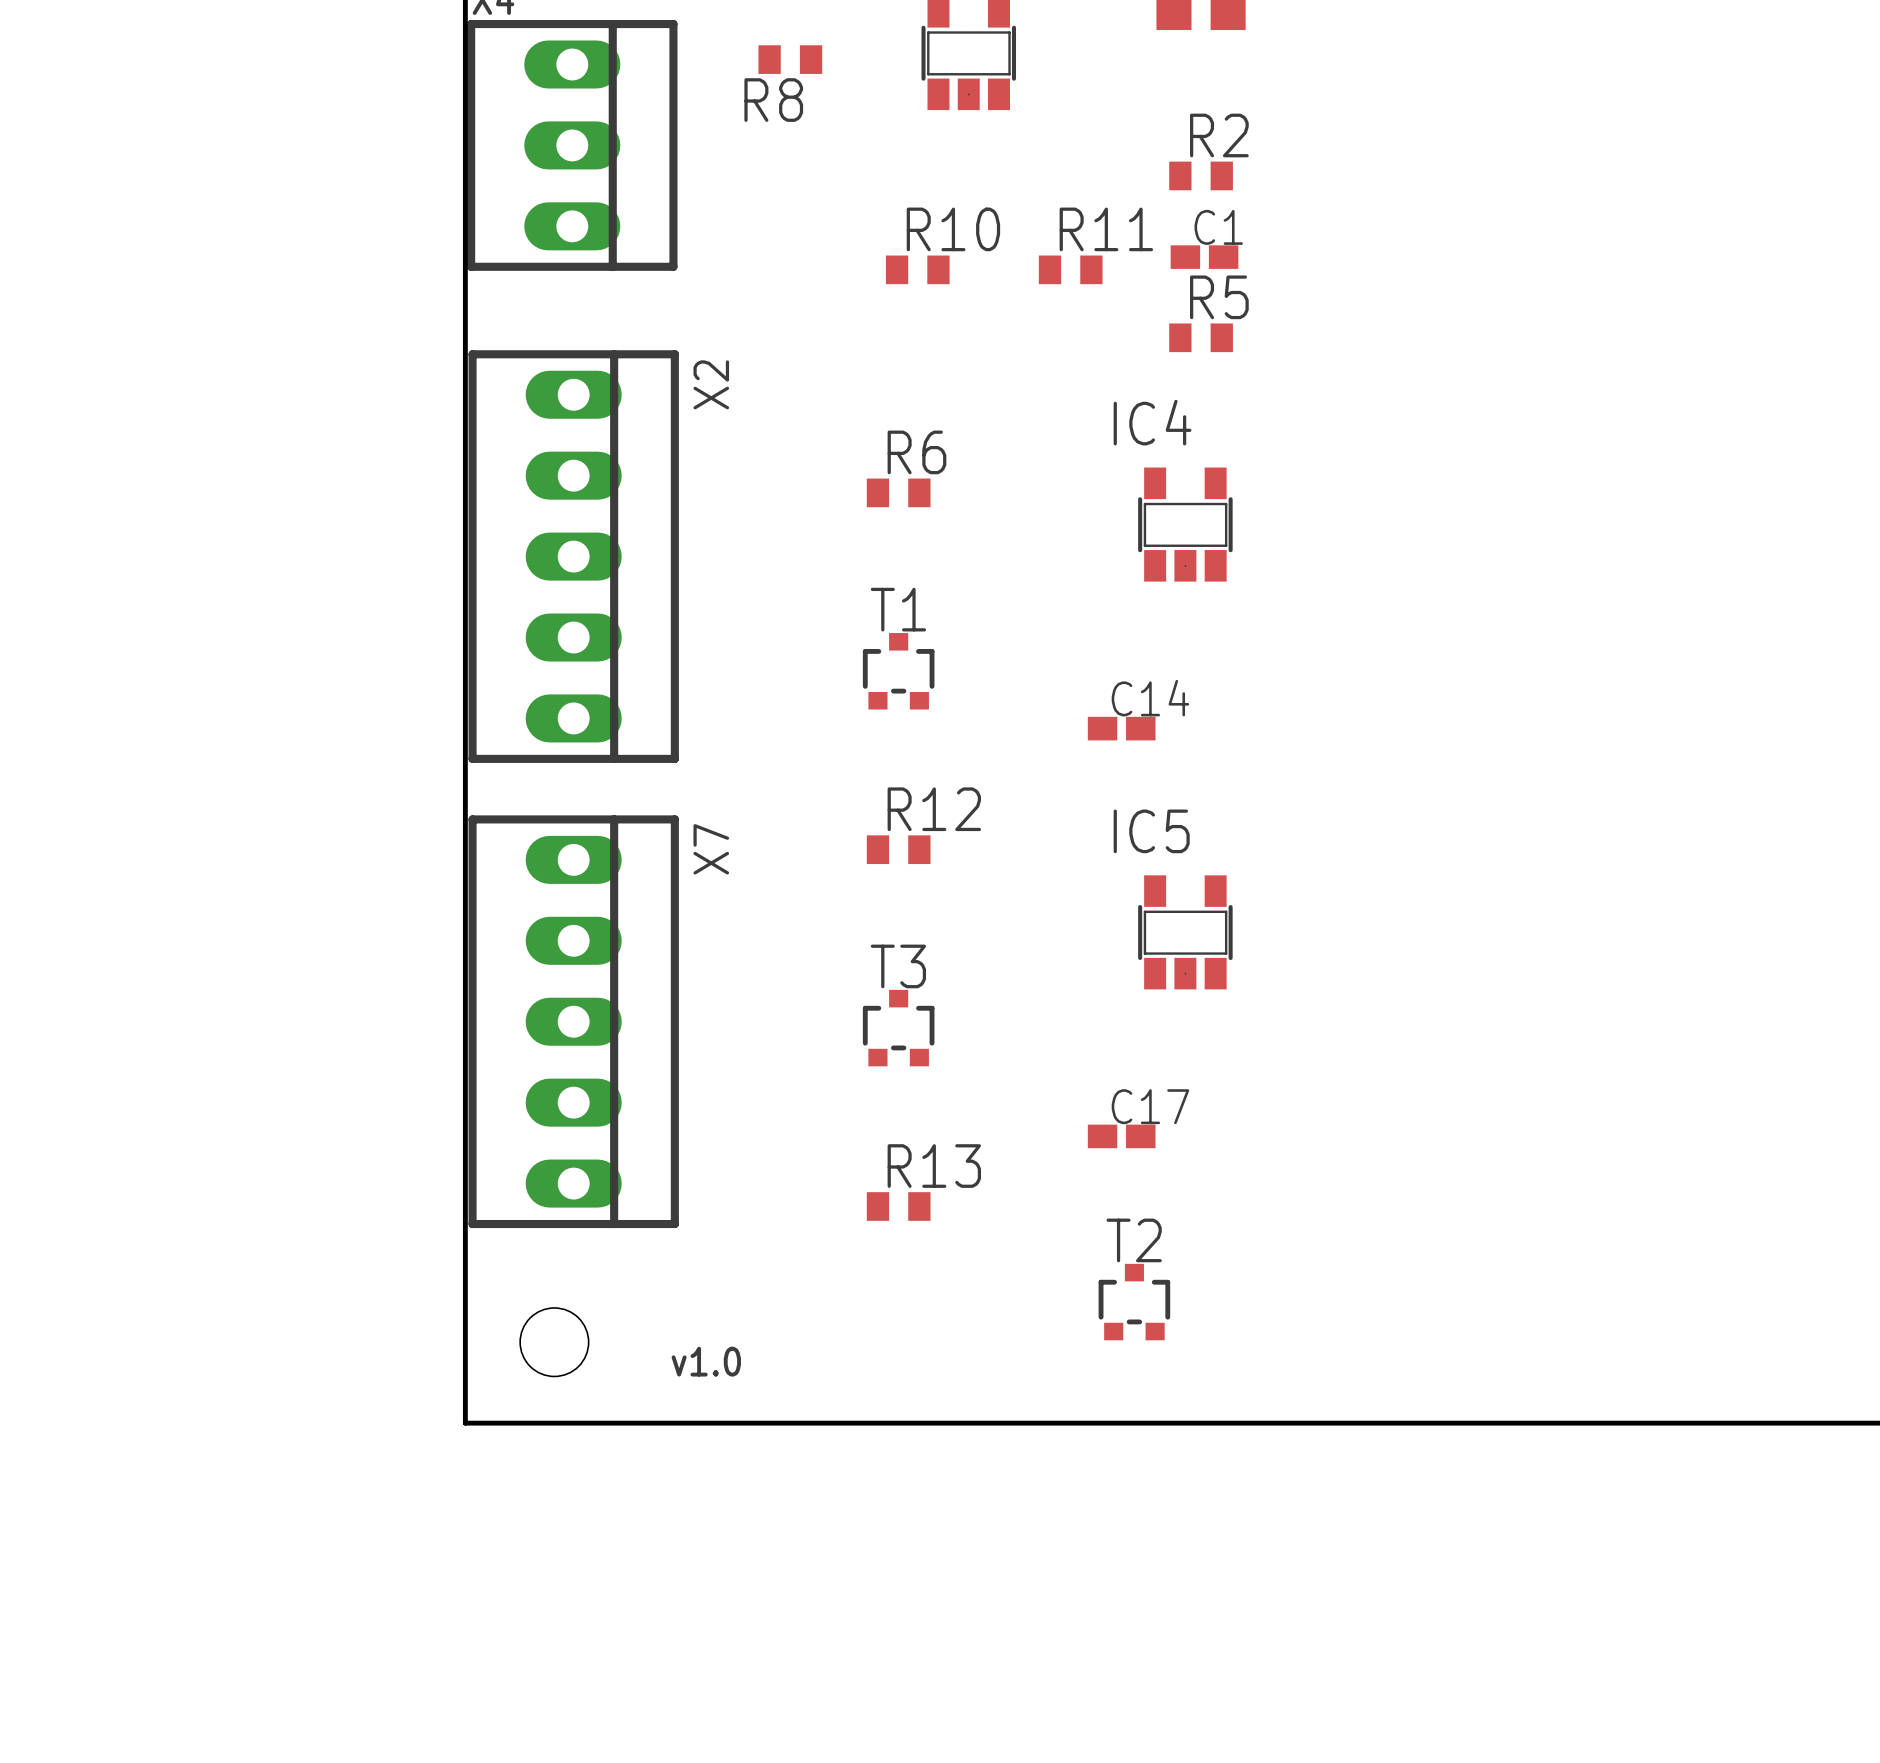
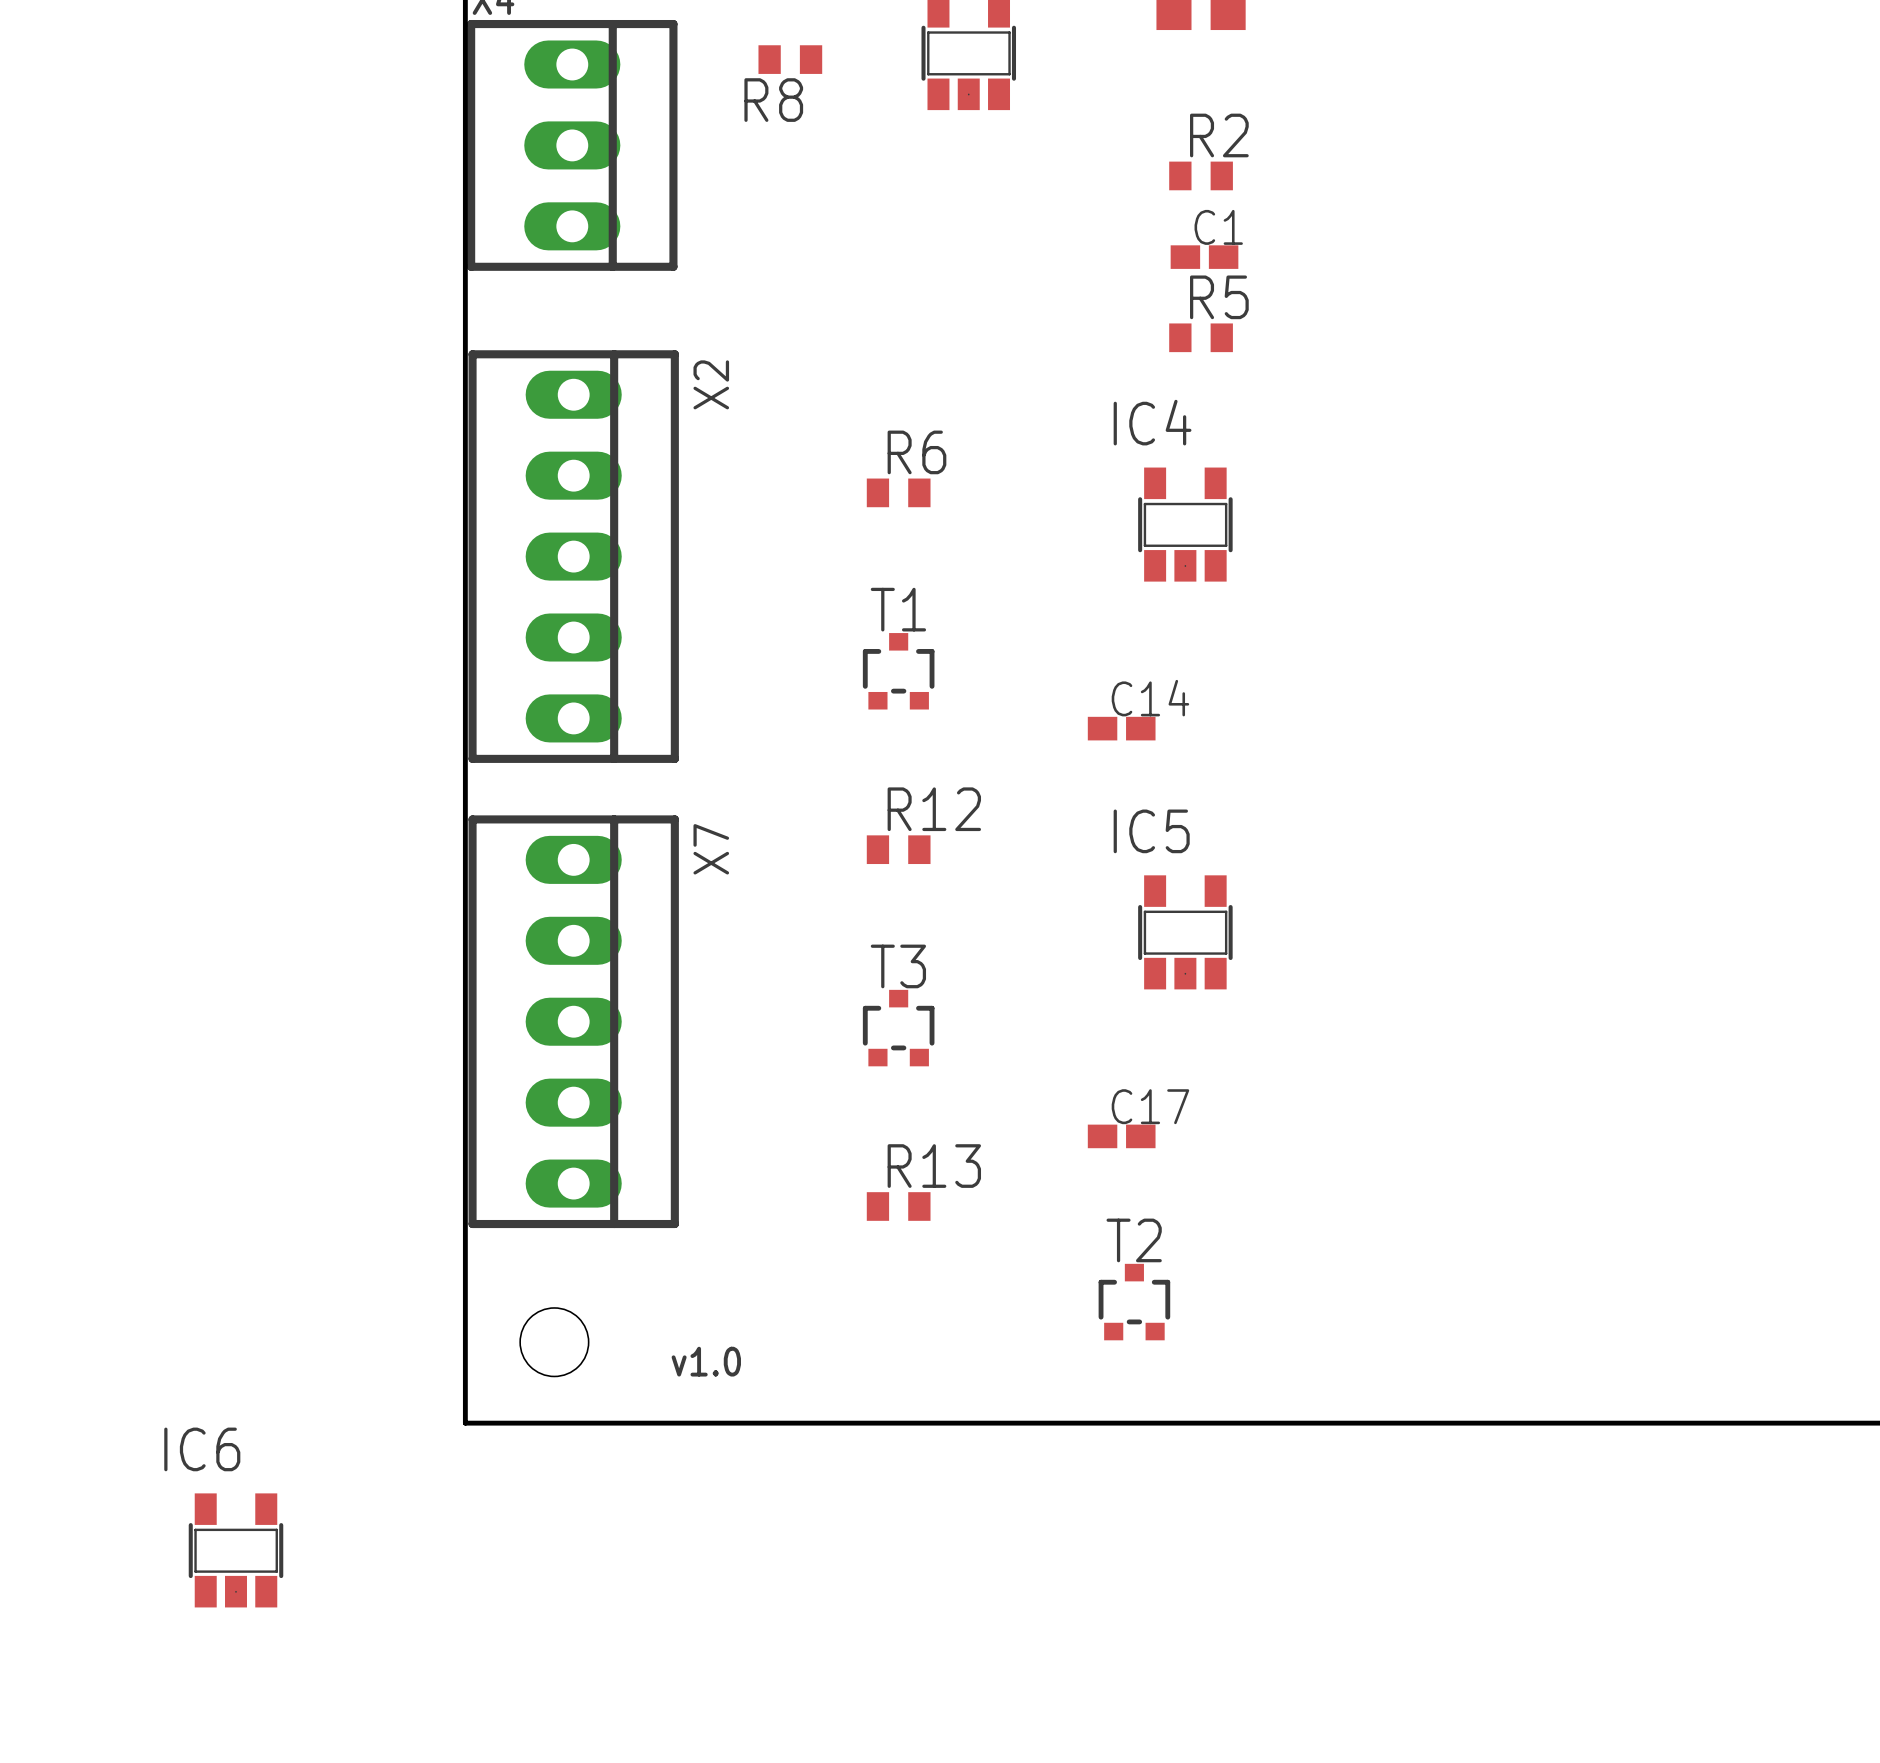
R10: (917, 269) -> none
R11: (1070, 269) -> none
IC6: none -> (236, 1550)

